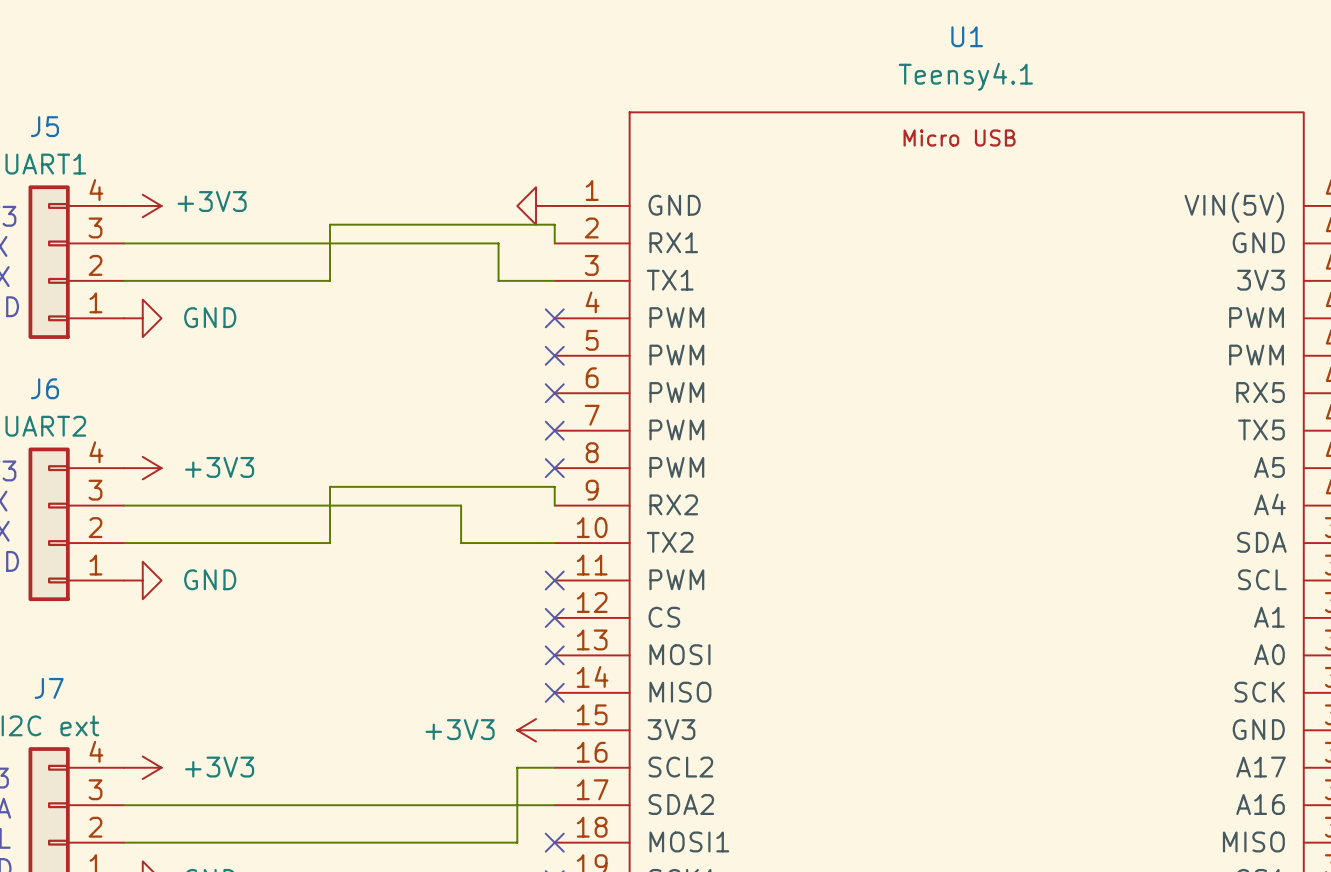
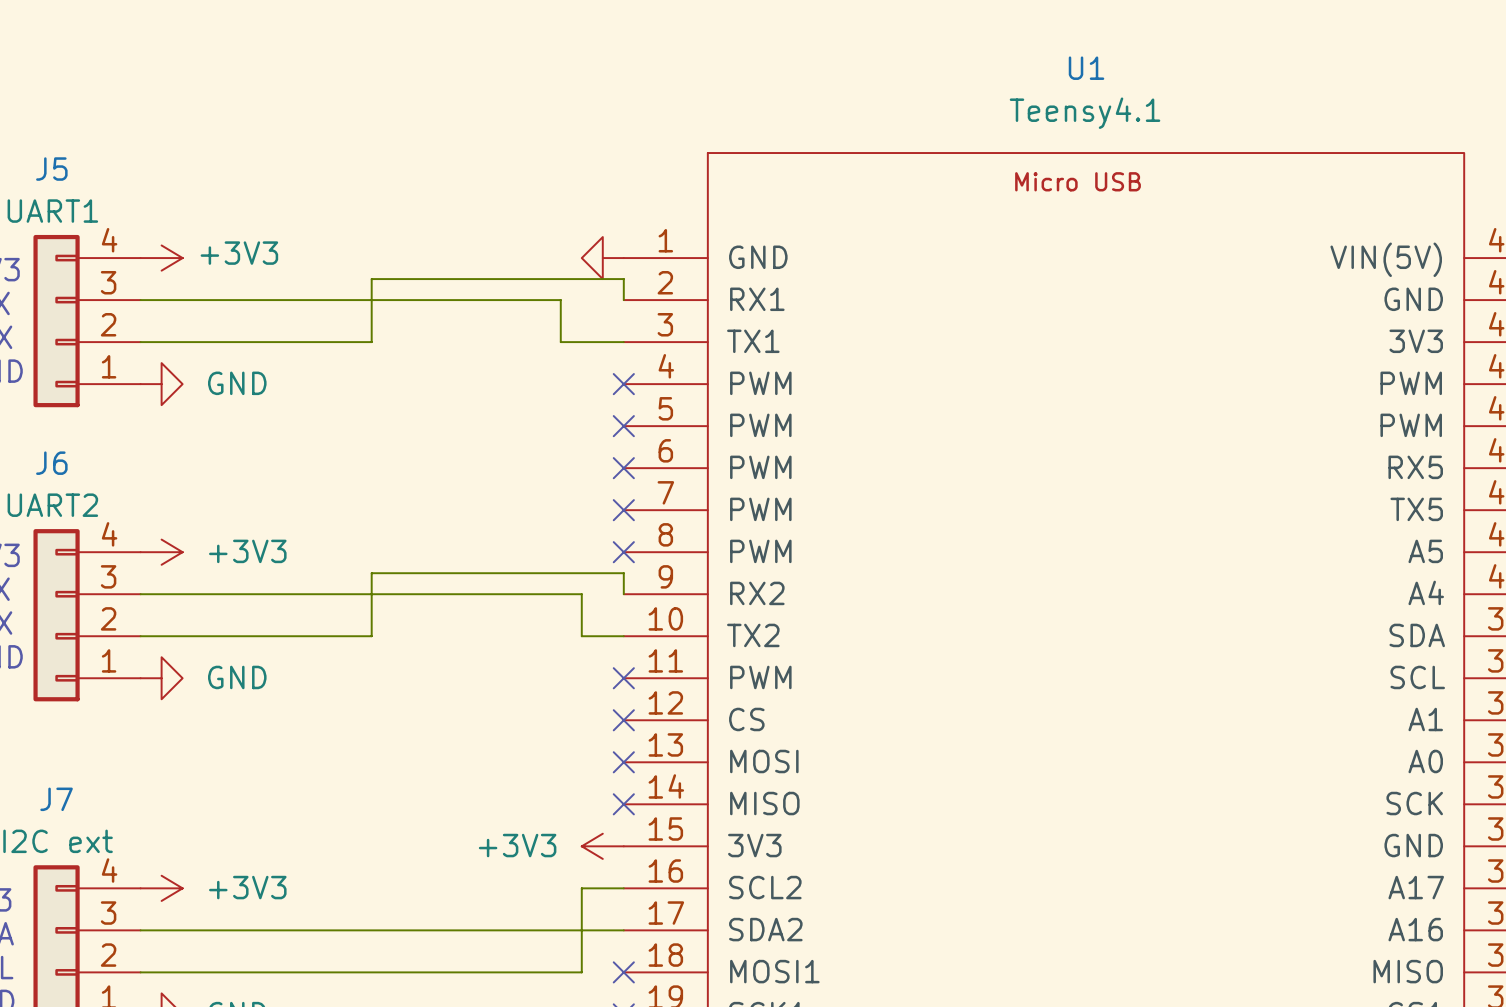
wire: (461, 505) (461, 543) (517, 543) -> (518, 594) (581, 594) (581, 636)

